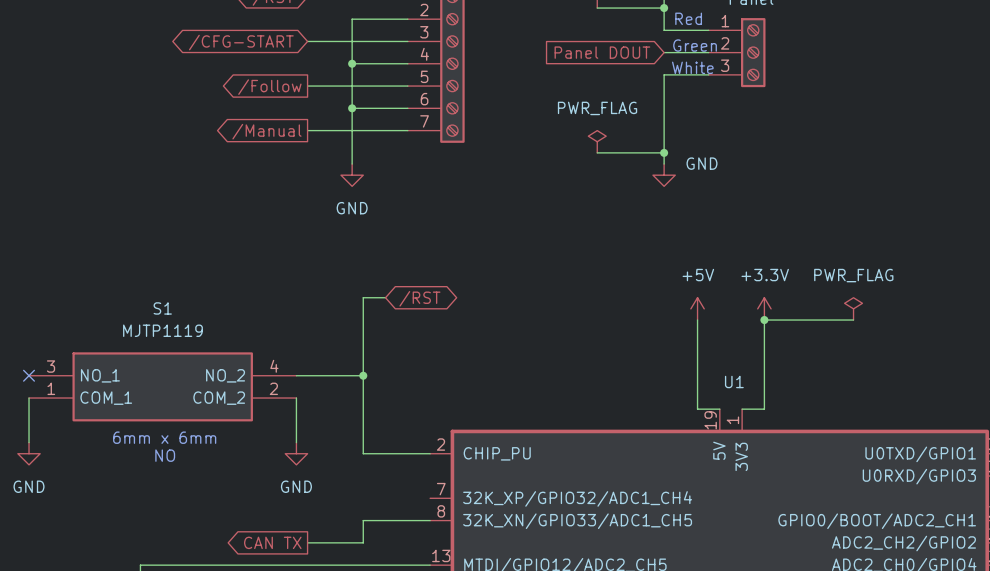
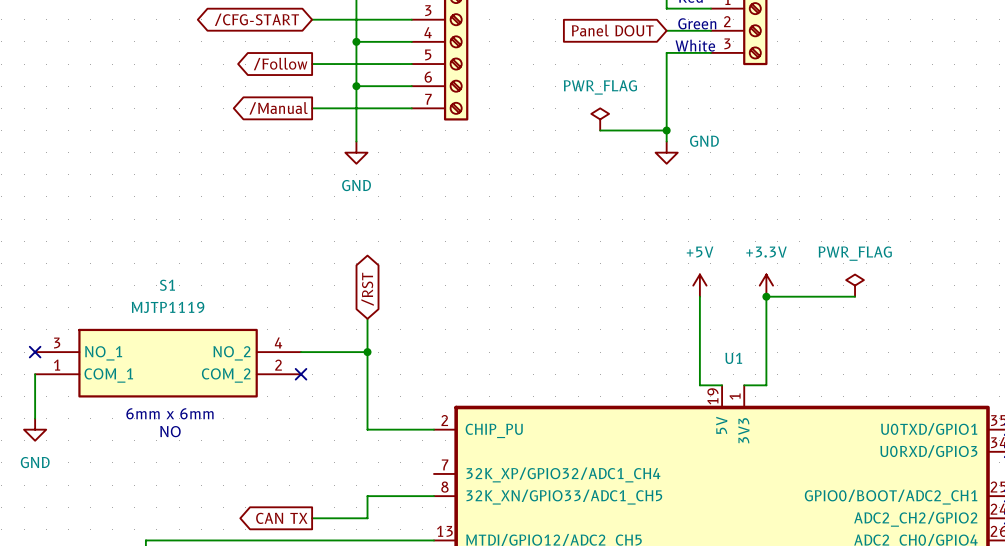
wire: (385, 297) (363, 297) (363, 342) -> none
global label rotation: 0° (419, 298) -> 90° counterclockwise (367, 289)
wire: (296, 398) (296, 442) -> none
no-connect mark: none -> (301, 374)
power symbol: GND (296, 453) -> none

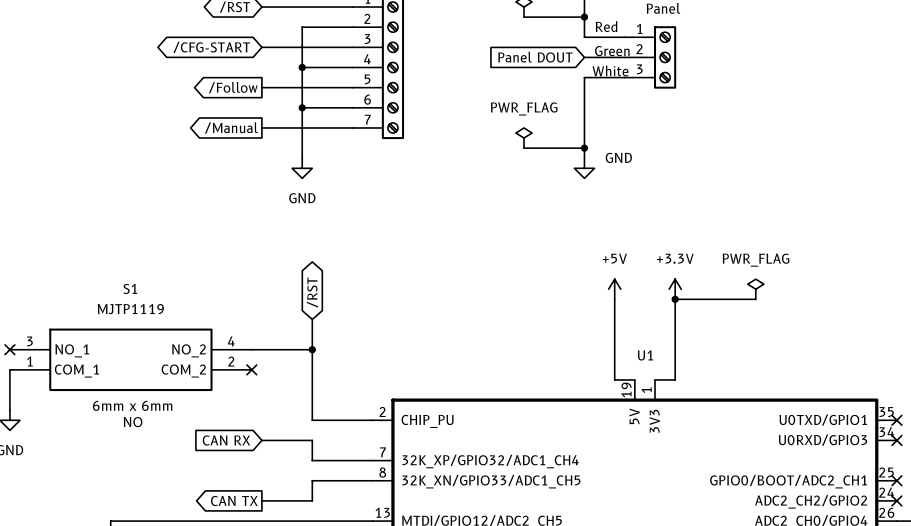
global label: none -> CAN RX (226, 440)
wire: none -> (261, 440) (312, 440) (312, 460) (372, 460)

